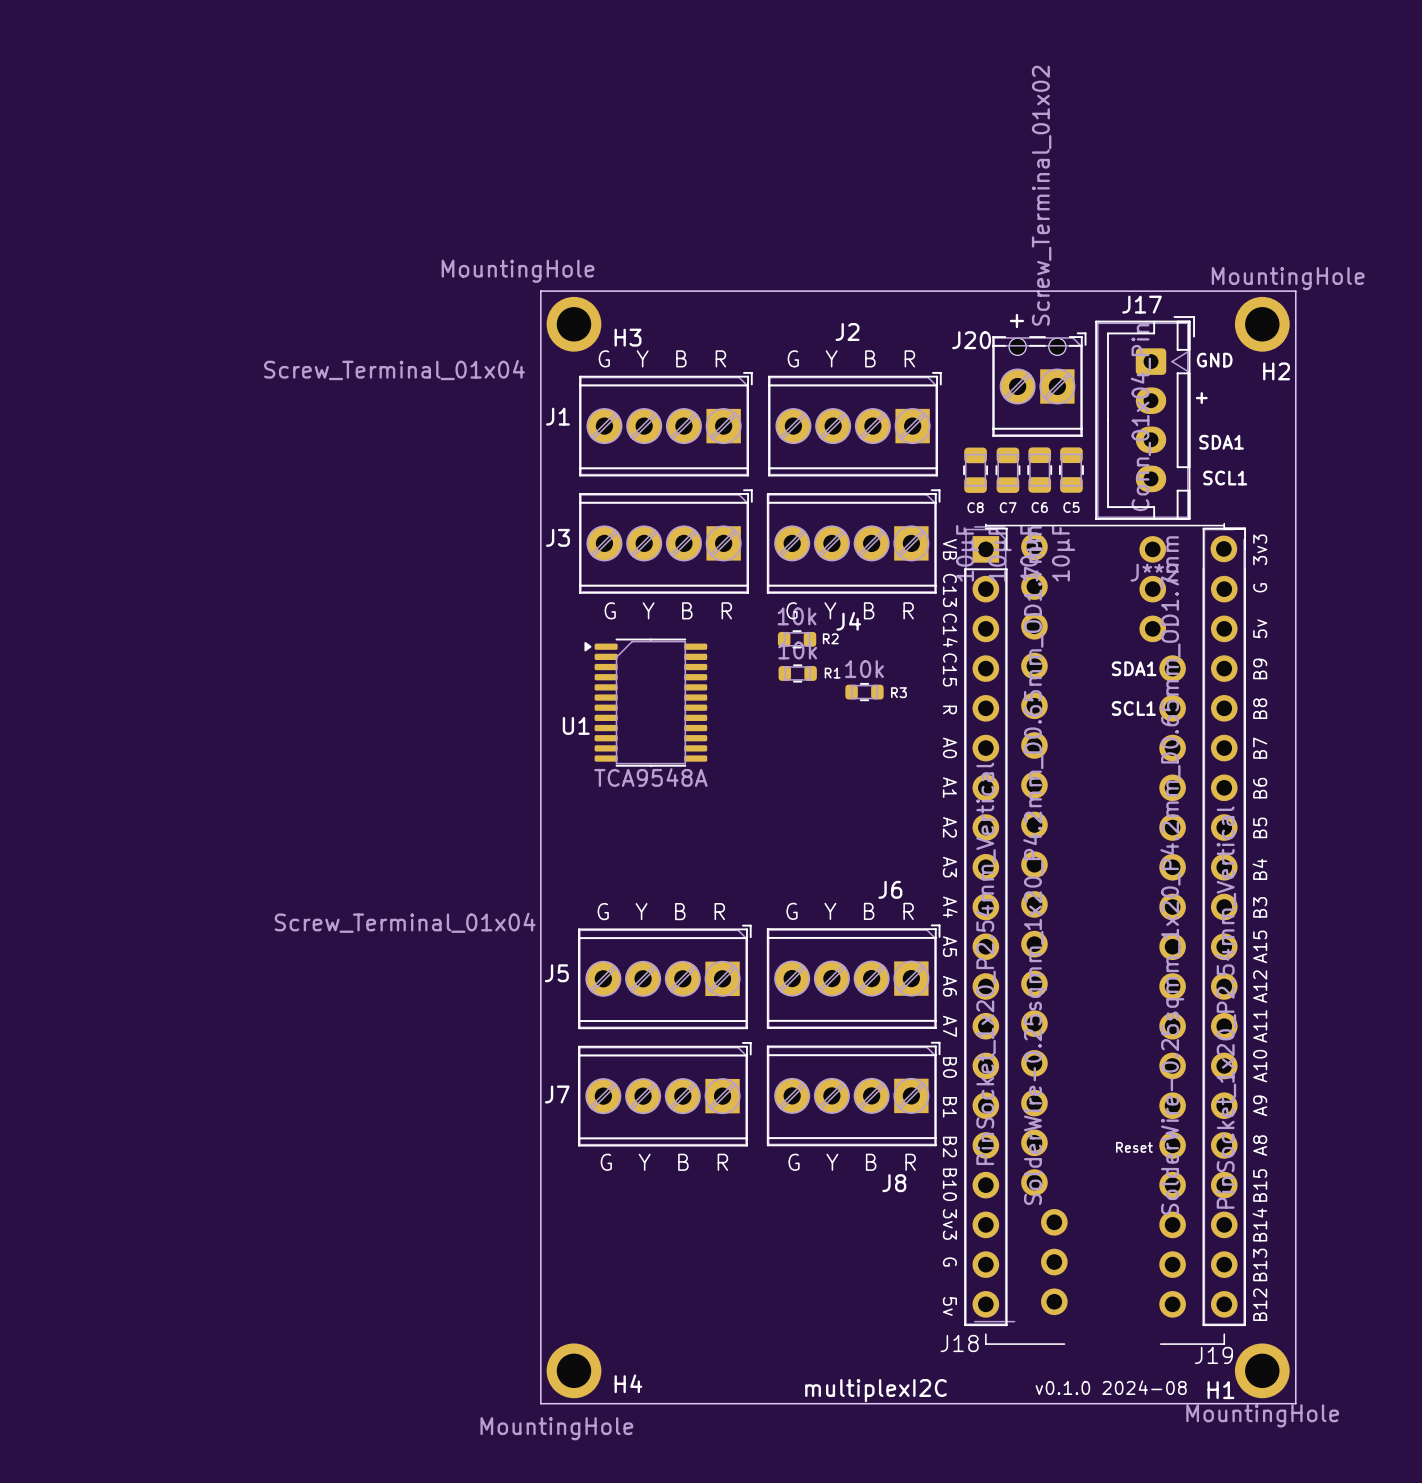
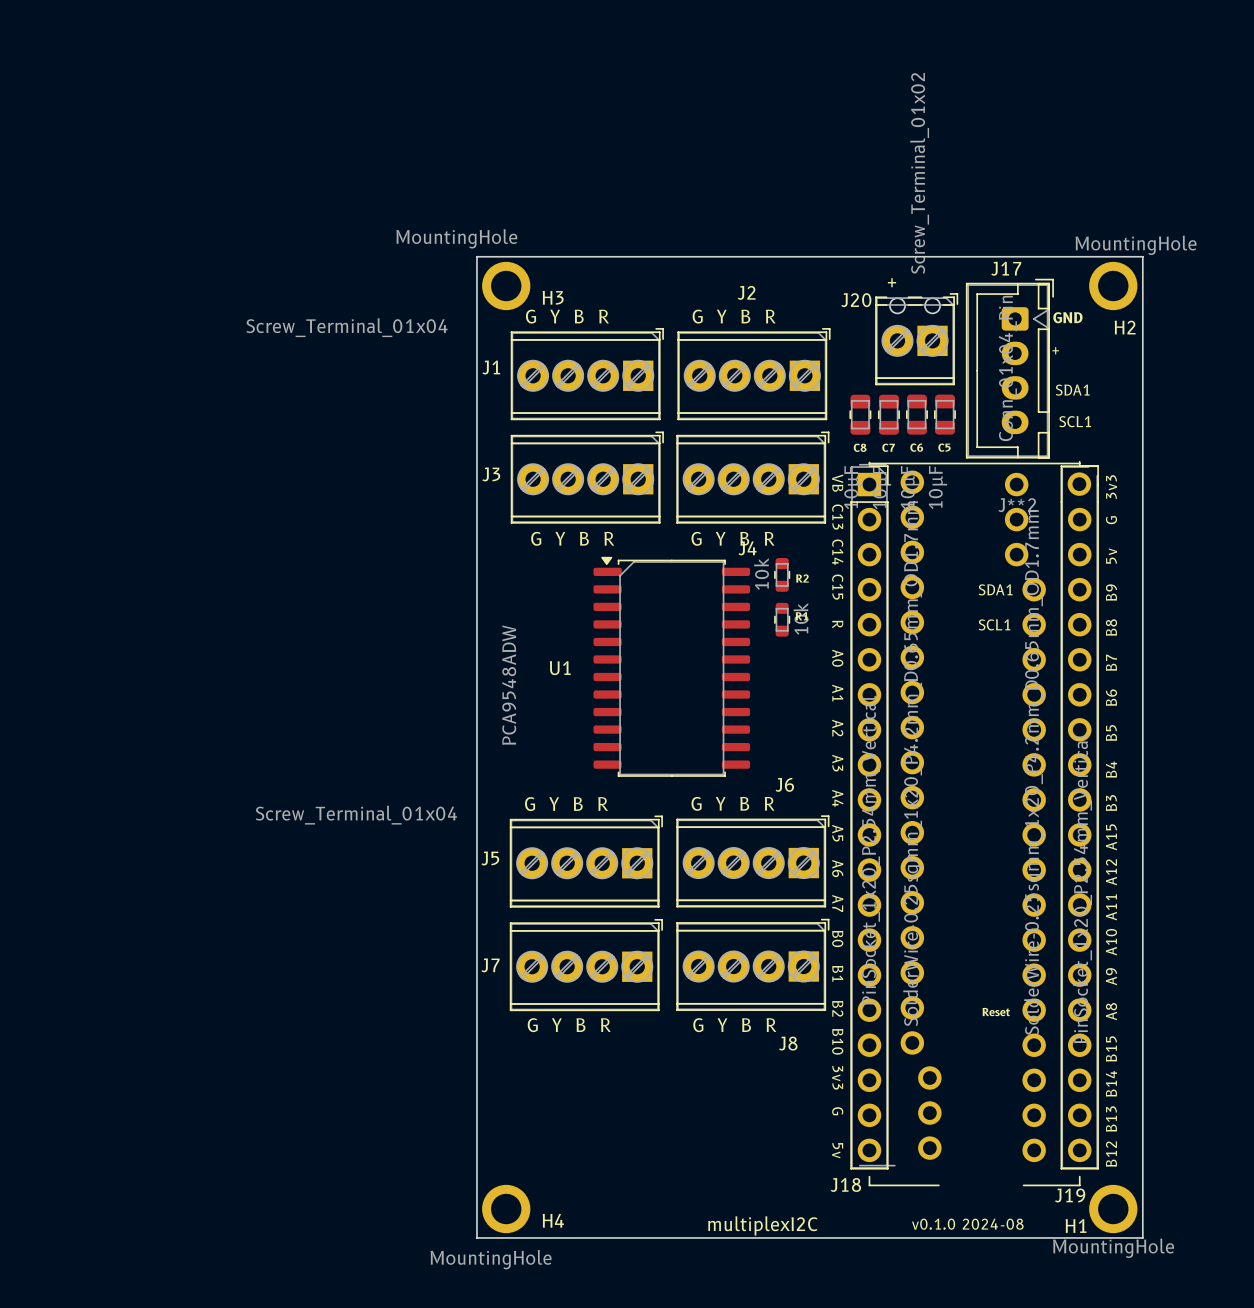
R2 value position: 10k (797, 616) -> 10k (761, 574)
U1 footprint: [584, 638, 708, 767] -> [593, 556, 751, 777]
R2 rotation: 0° (797, 639) -> 90° clockwise (782, 574)
R2 position: (797, 639) -> (782, 574)
R1 rotation: 0° (797, 673) -> 90° clockwise (782, 619)
R1 position: (797, 673) -> (782, 619)
R3: 10k (864, 692) -> none
U1 name position: U1 (576, 725) -> U1 (560, 668)
U1 value: TCA9548A (650, 777) -> PCA9548ADW (509, 685)

